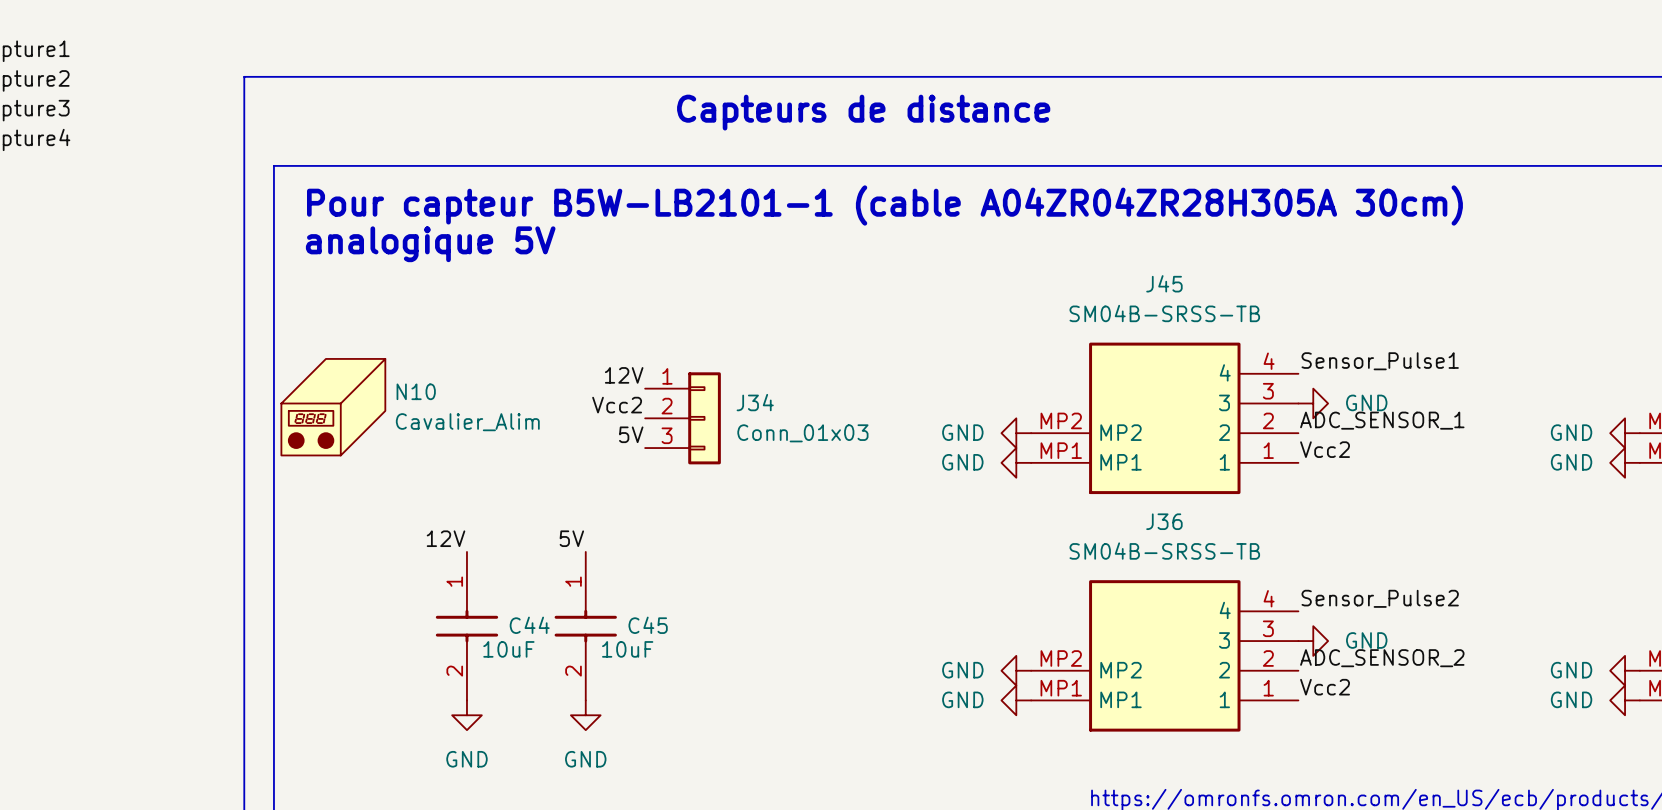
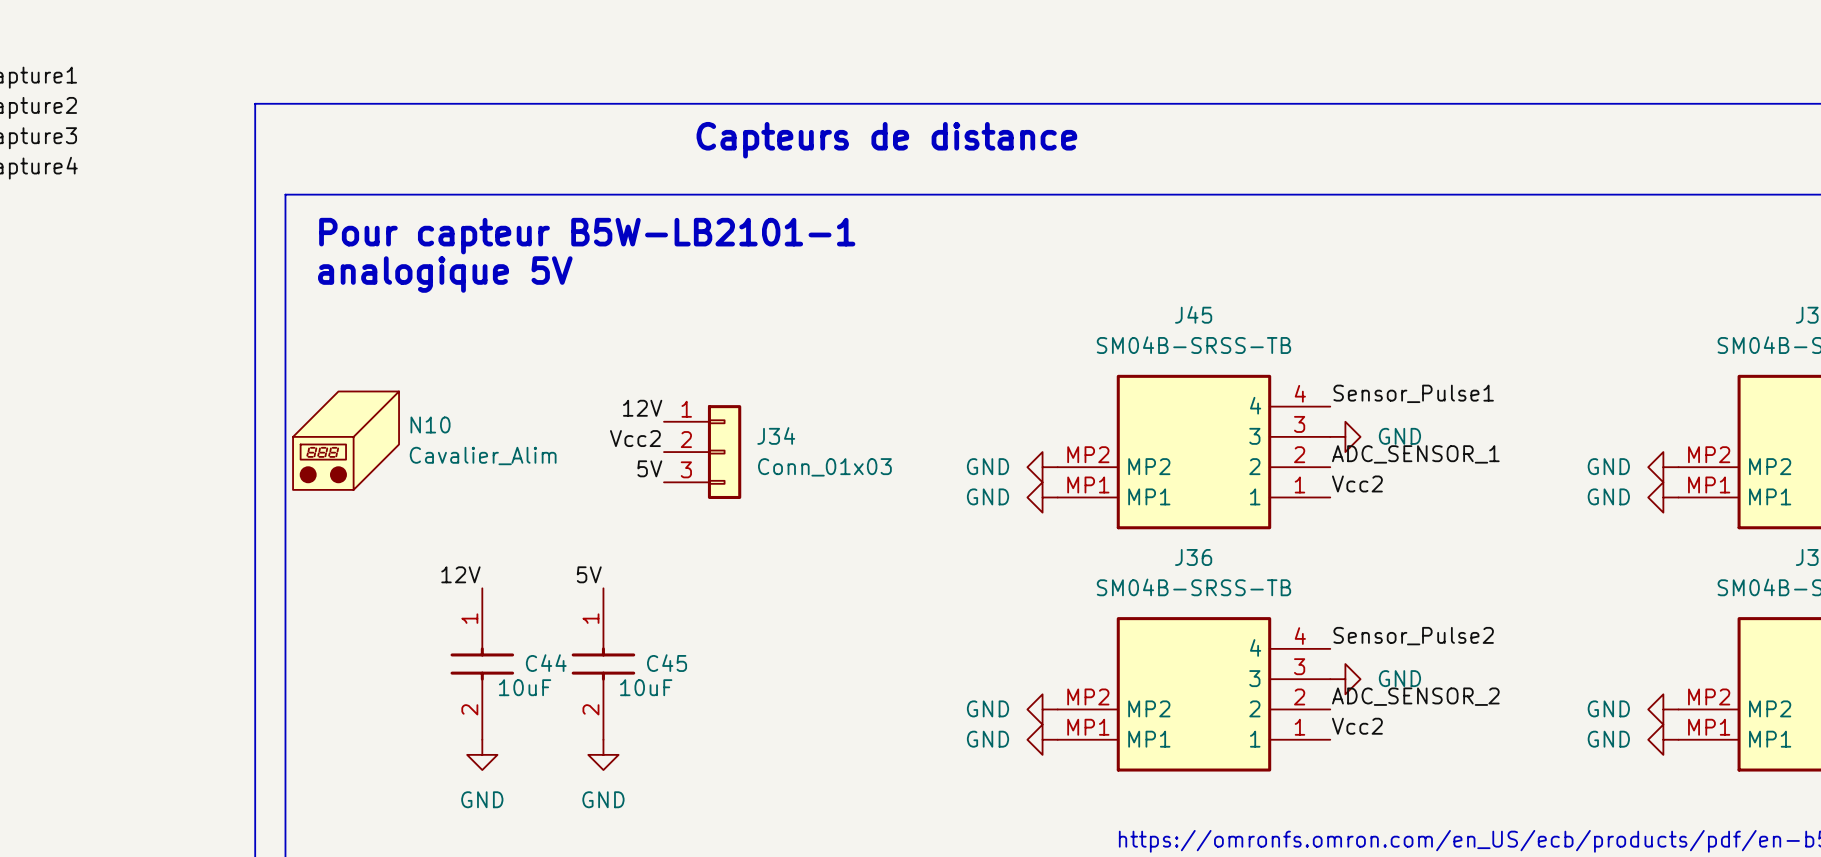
text: Pour capteur B5W-LB2101-1 (cable A04ZR04ZR28H305A 30cm) (884, 205) -> Pour capteur B5W-LB2101-1 (587, 236)

